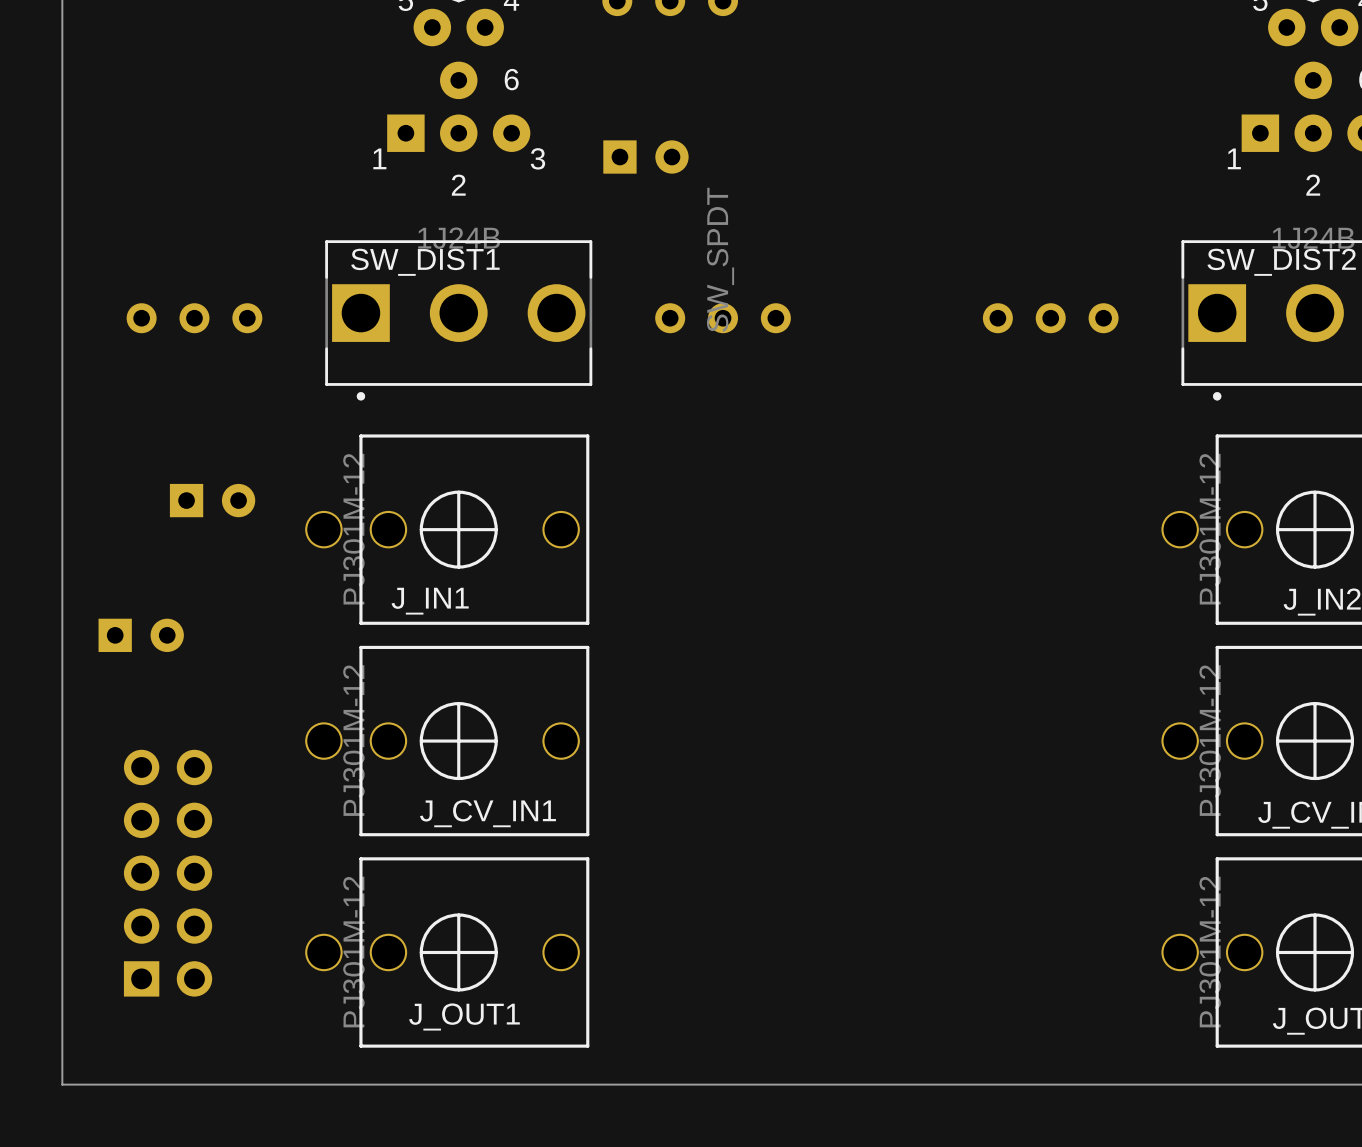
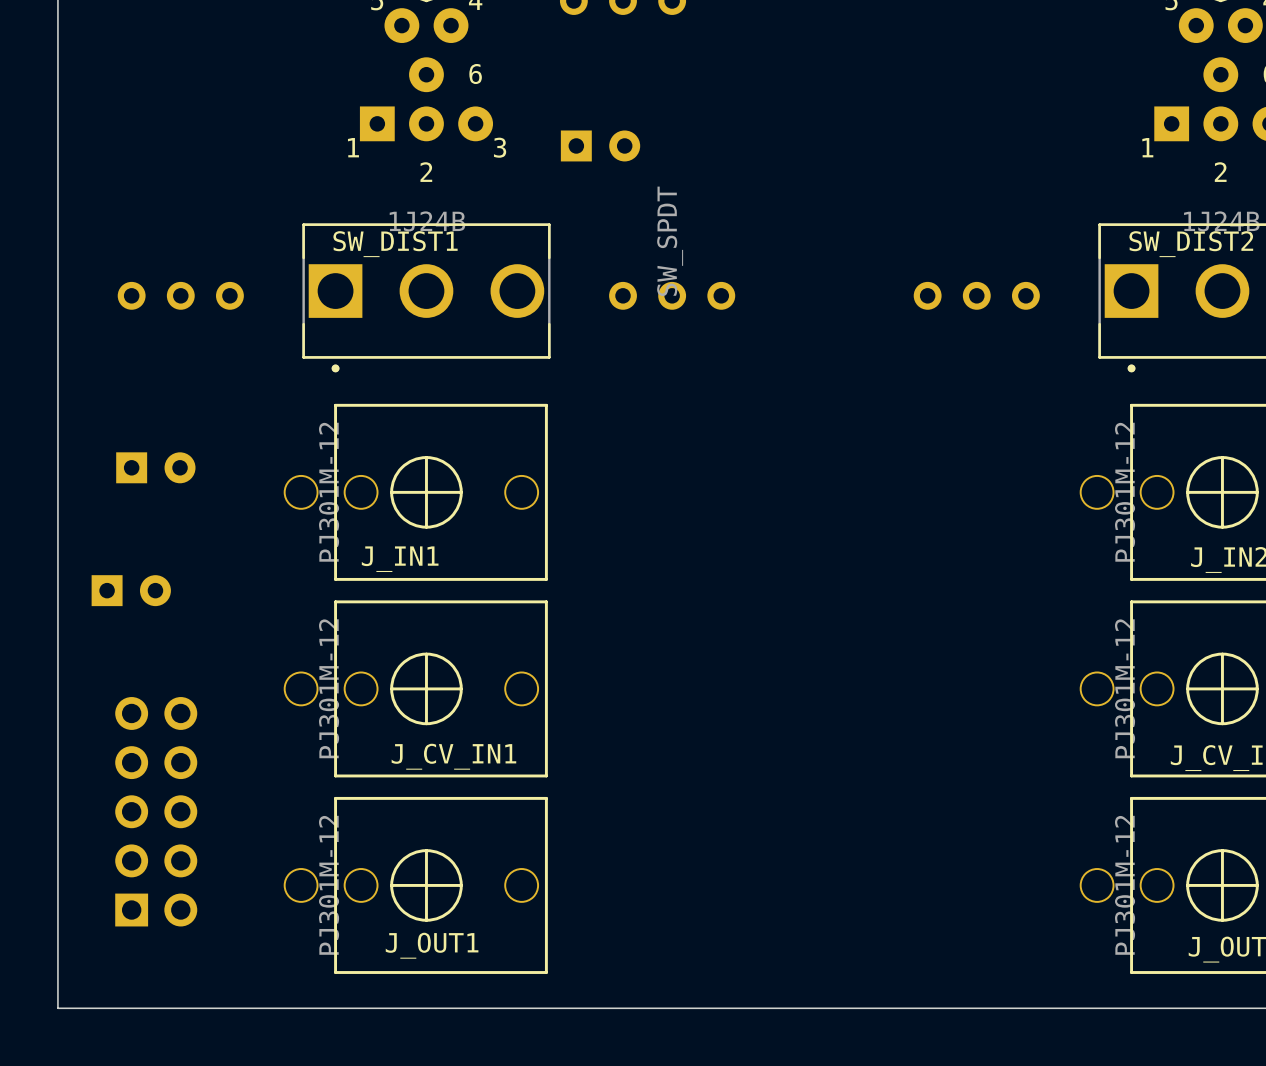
part position: (212, 500) -> (155, 467)

